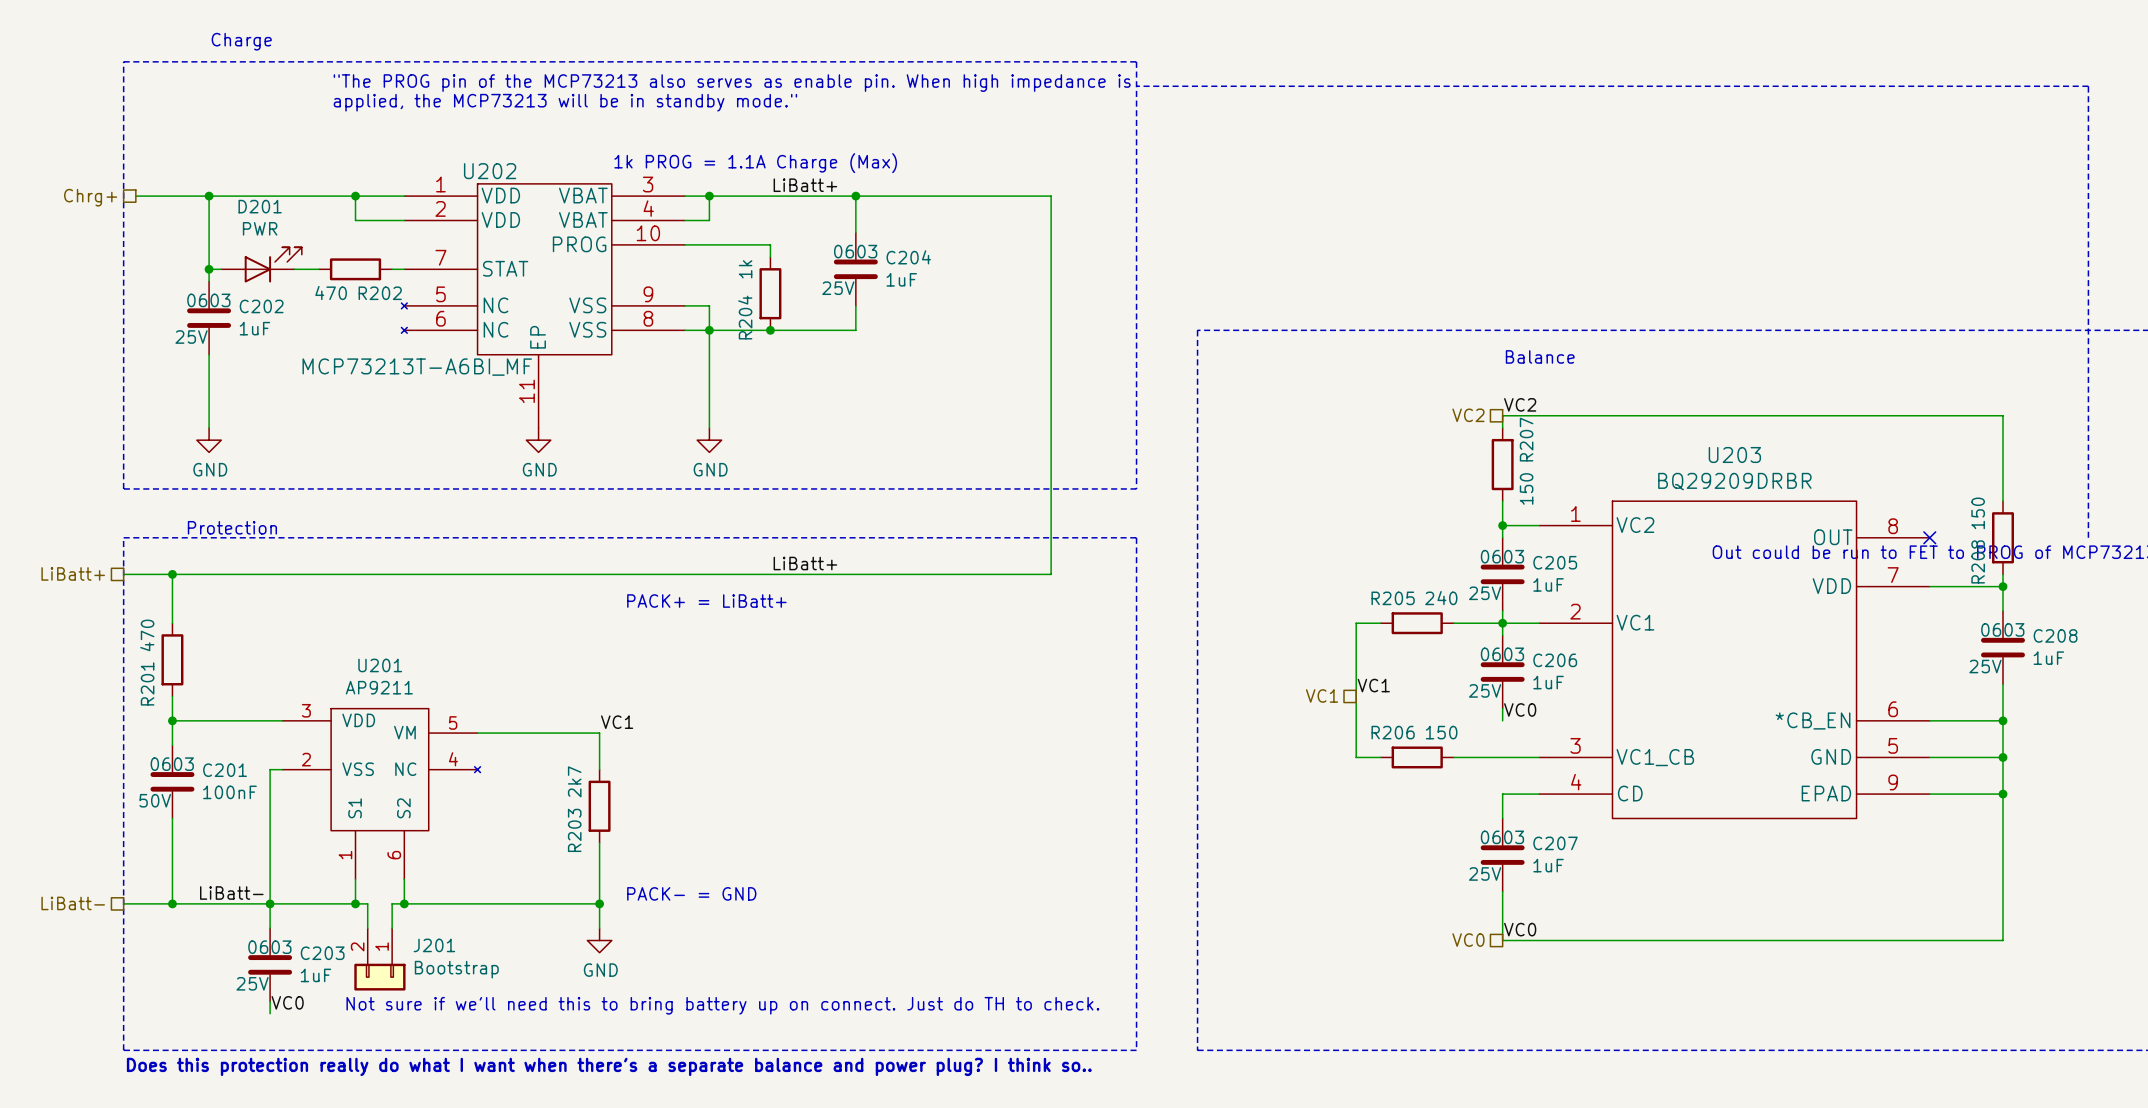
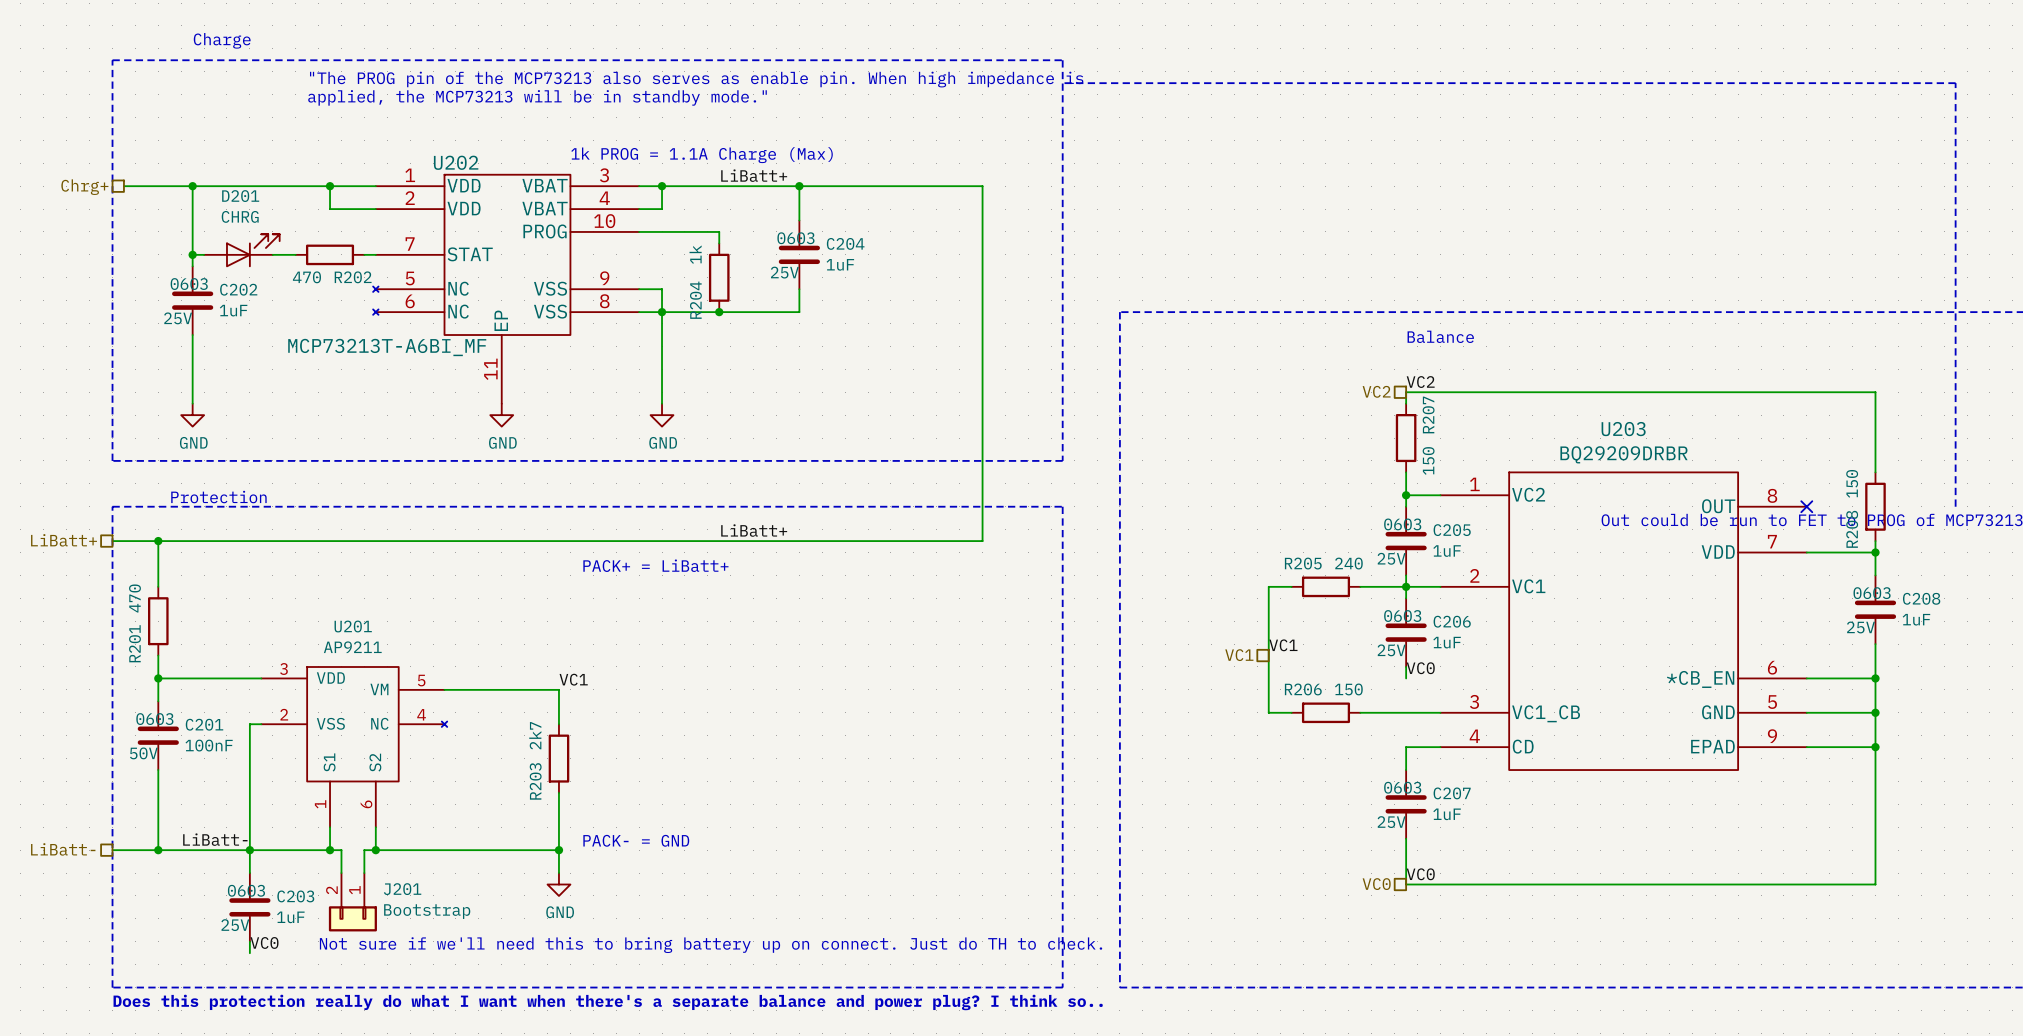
D201 value: PWR (260, 228) -> CHRG (240, 216)

